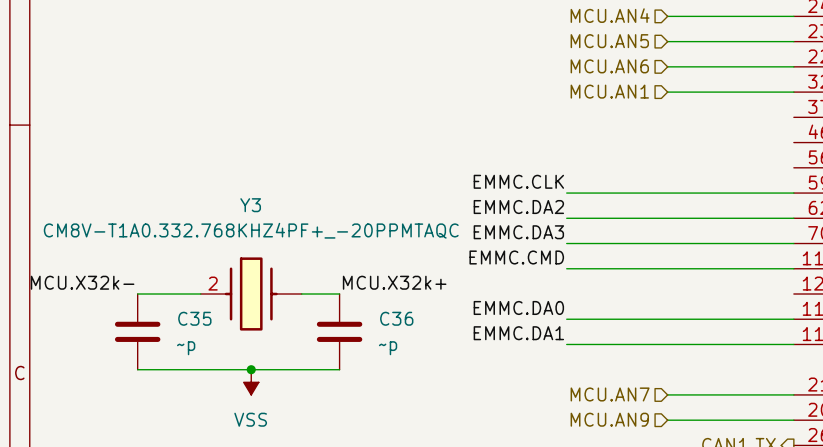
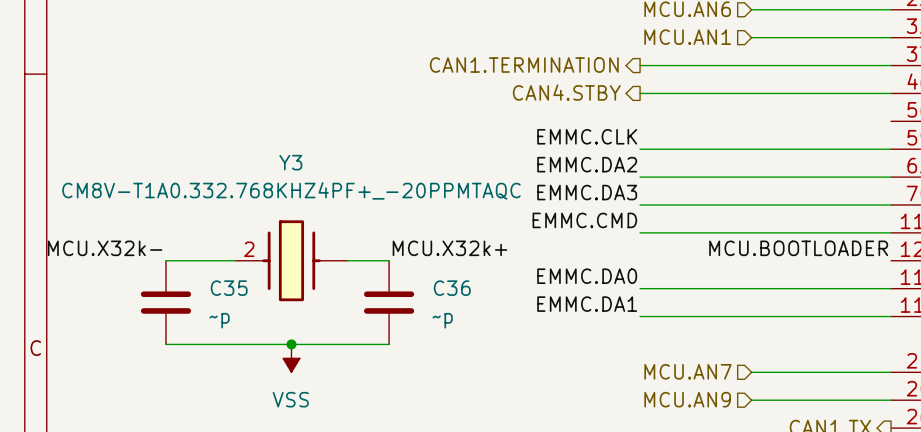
hierarchical label: none -> CAN1.TERMINATION (524, 65)
wire: none -> (640, 65) (891, 65)
hierarchical label: none -> CAN4.STBY (566, 92)
wire: none -> (640, 93) (891, 93)
label: none -> MCU.BOOTLOADER (798, 248)

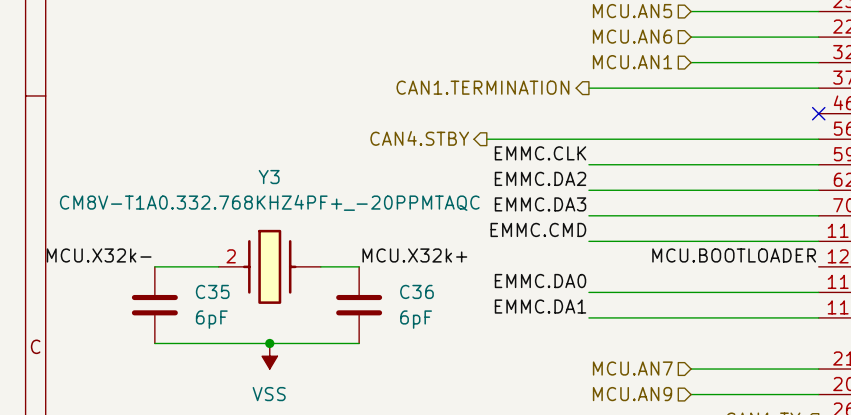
hierarchical label position: CAN4.STBY (566, 92) -> CAN4.STBY (419, 138)
wire: (640, 93) (891, 93) -> none
no-connect mark: none -> (818, 113)
wire: none -> (486, 139) (818, 139)
C35 value: ~p (219, 320) -> 6pF (211, 319)
C36 value: ~p (442, 320) -> 6pF (416, 319)

